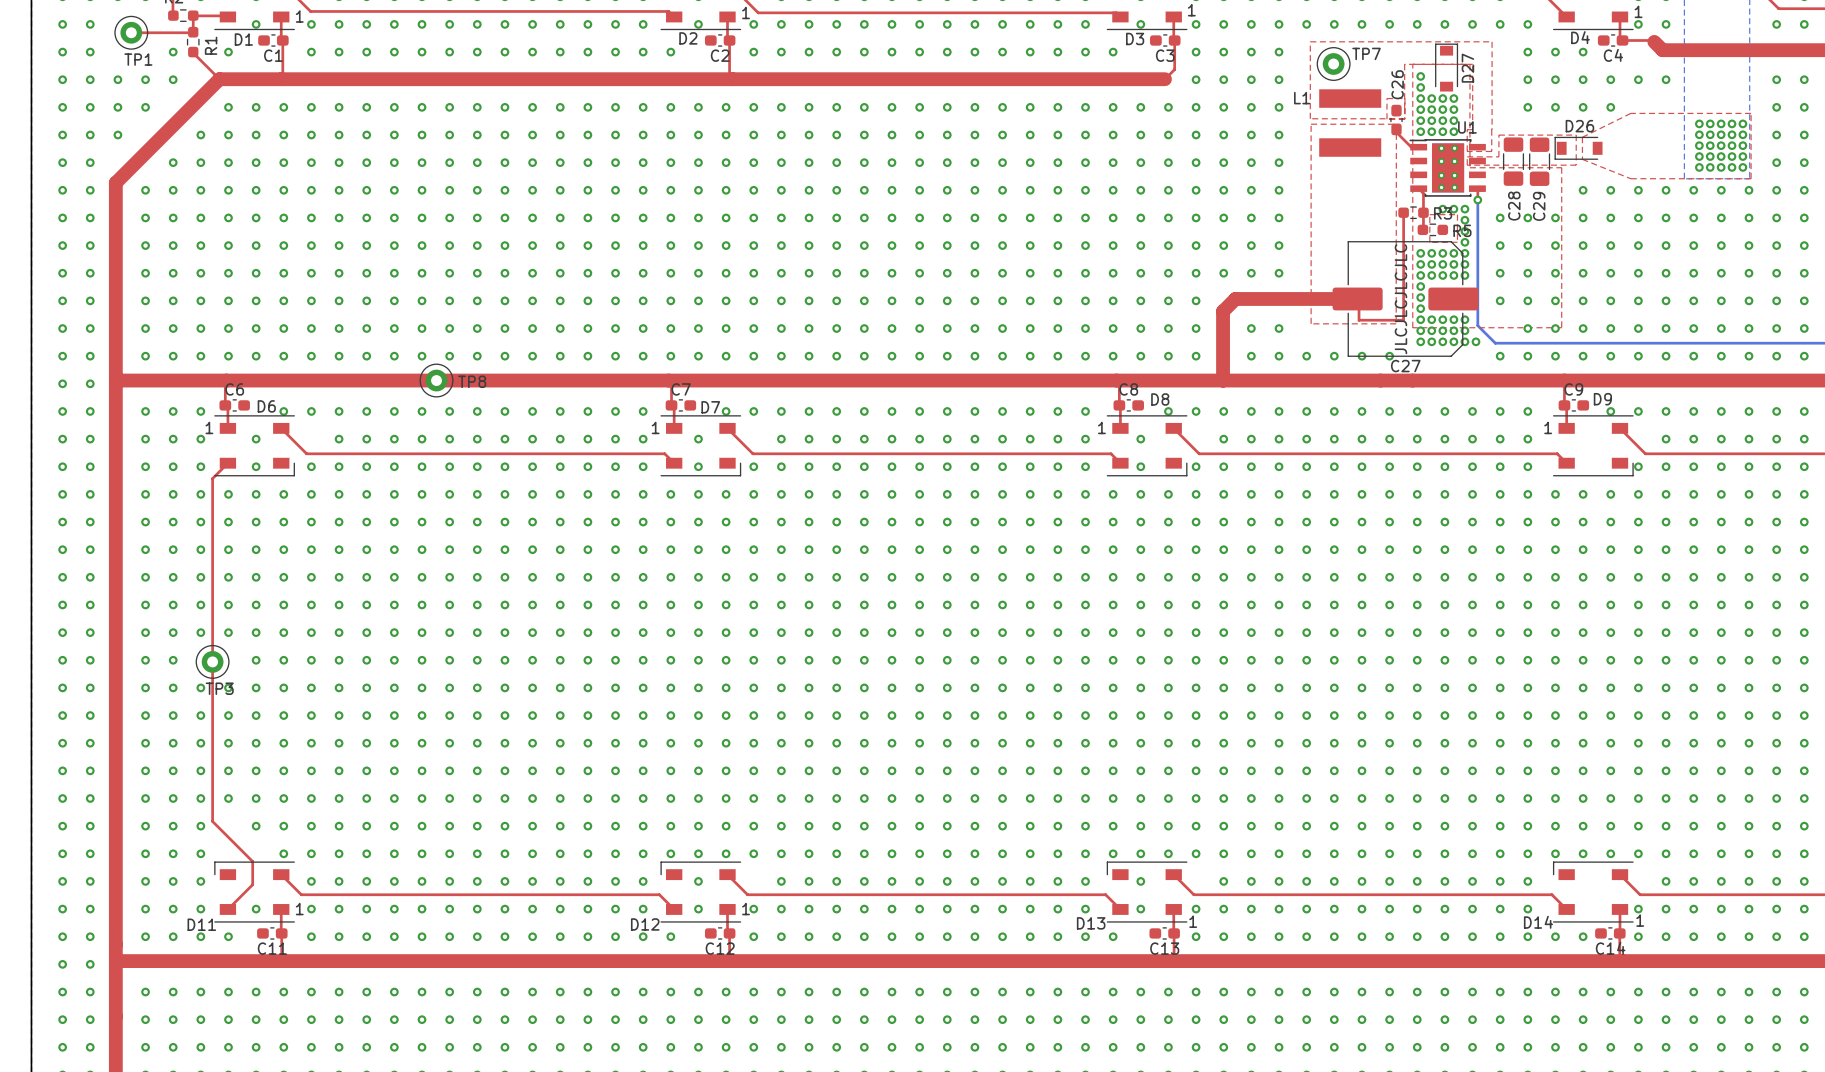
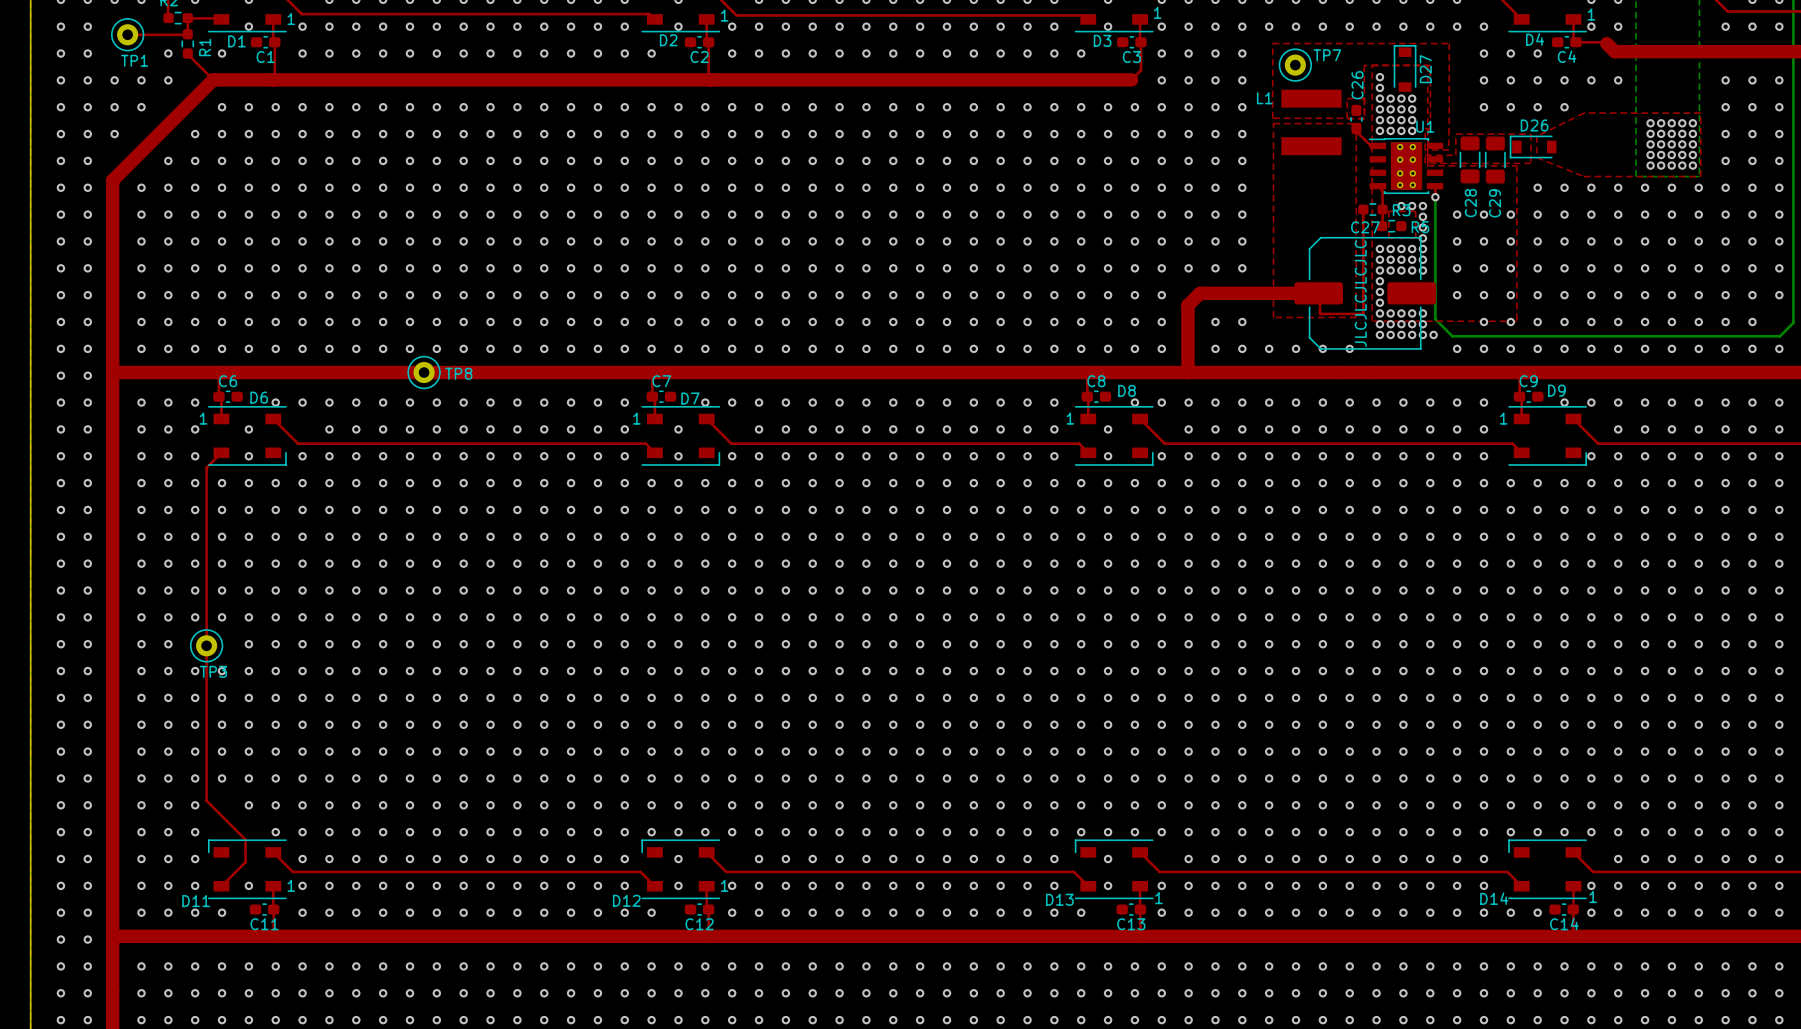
C27 rotation: 0° (1405, 298) -> 180° (1365, 293)

